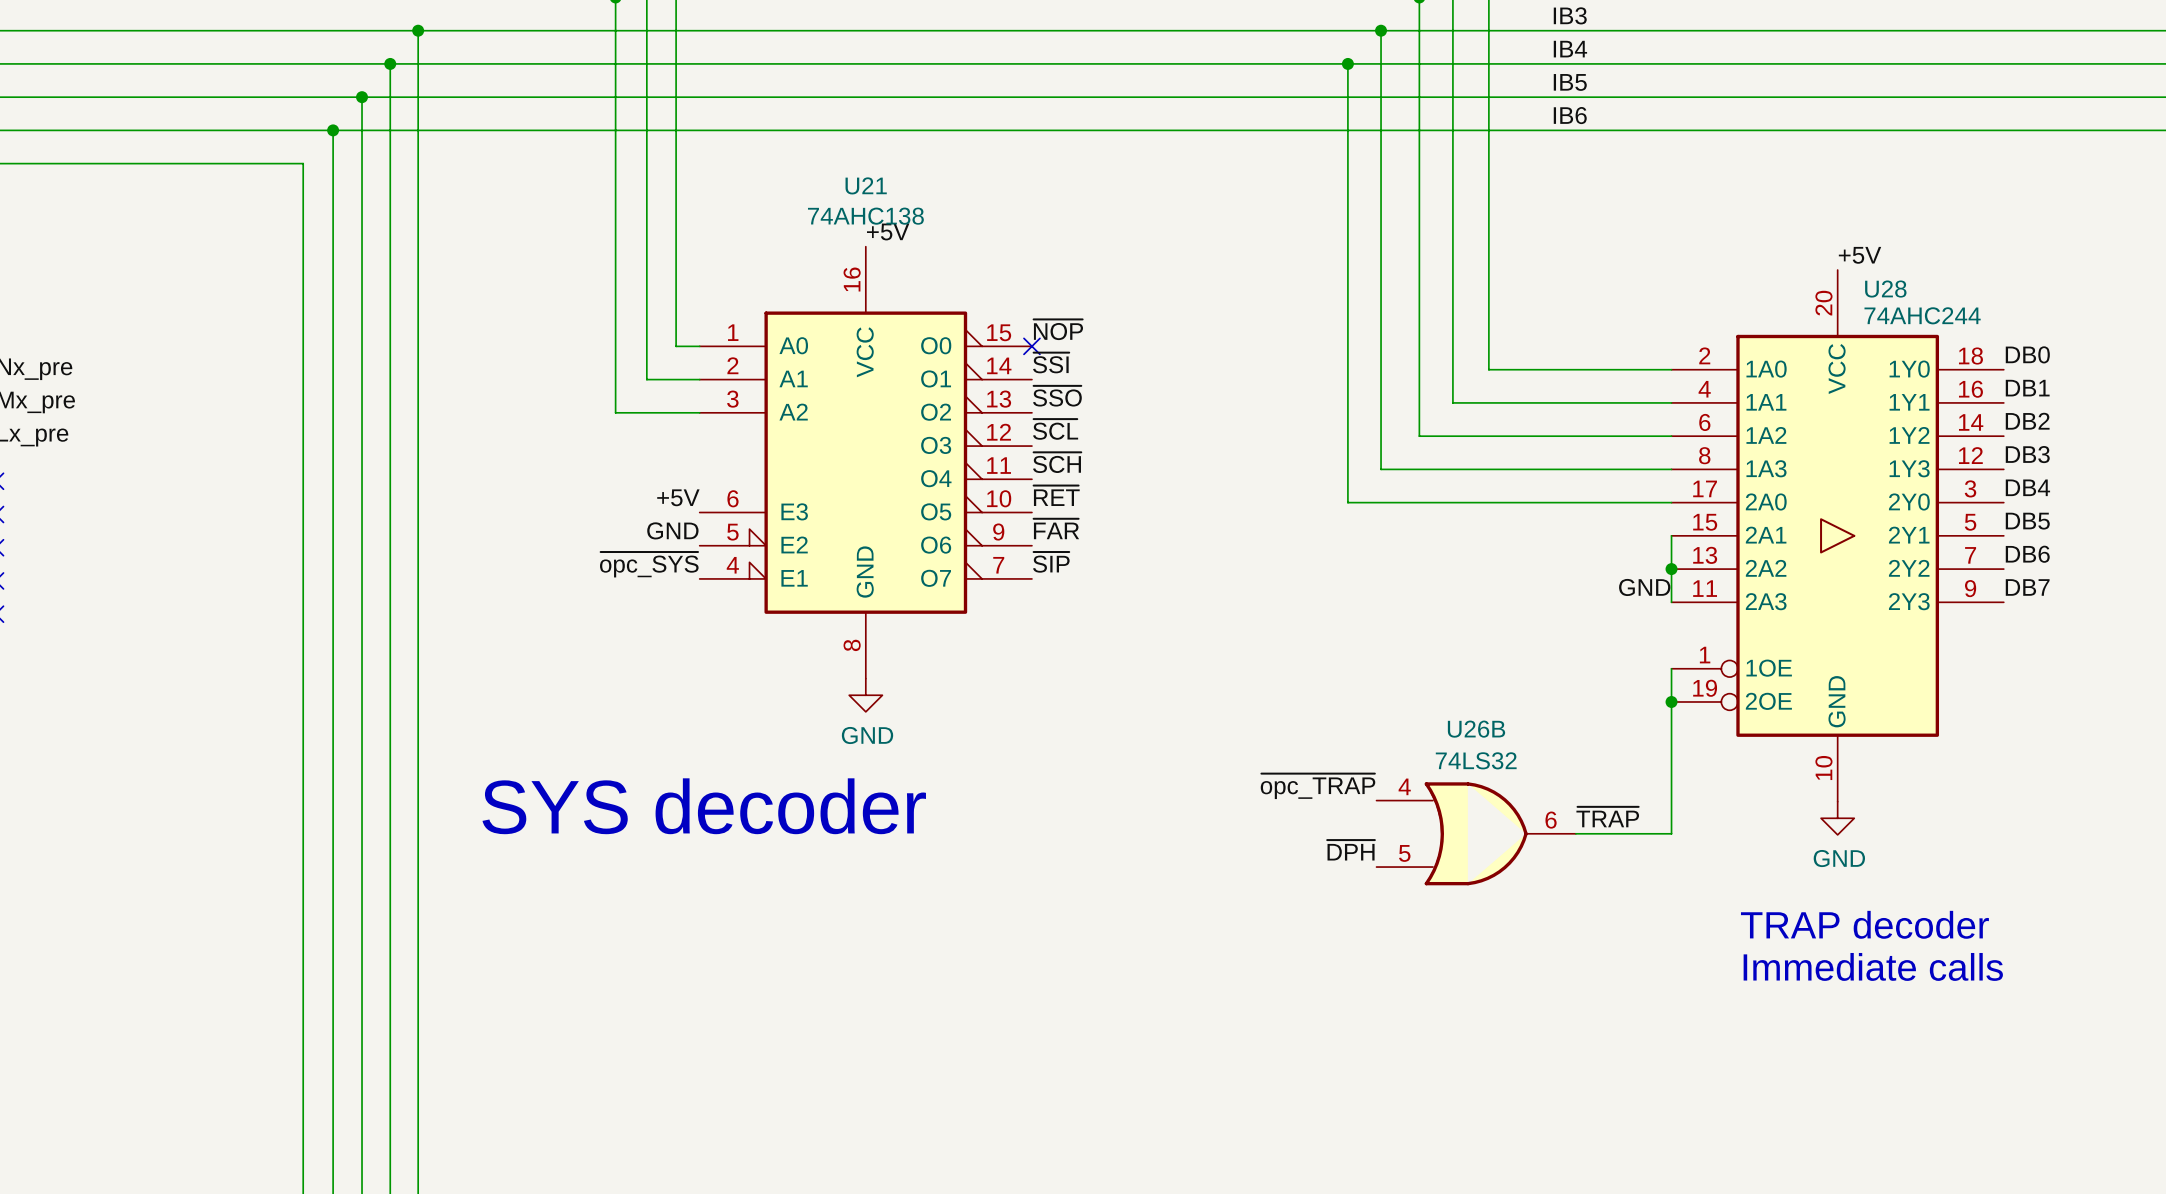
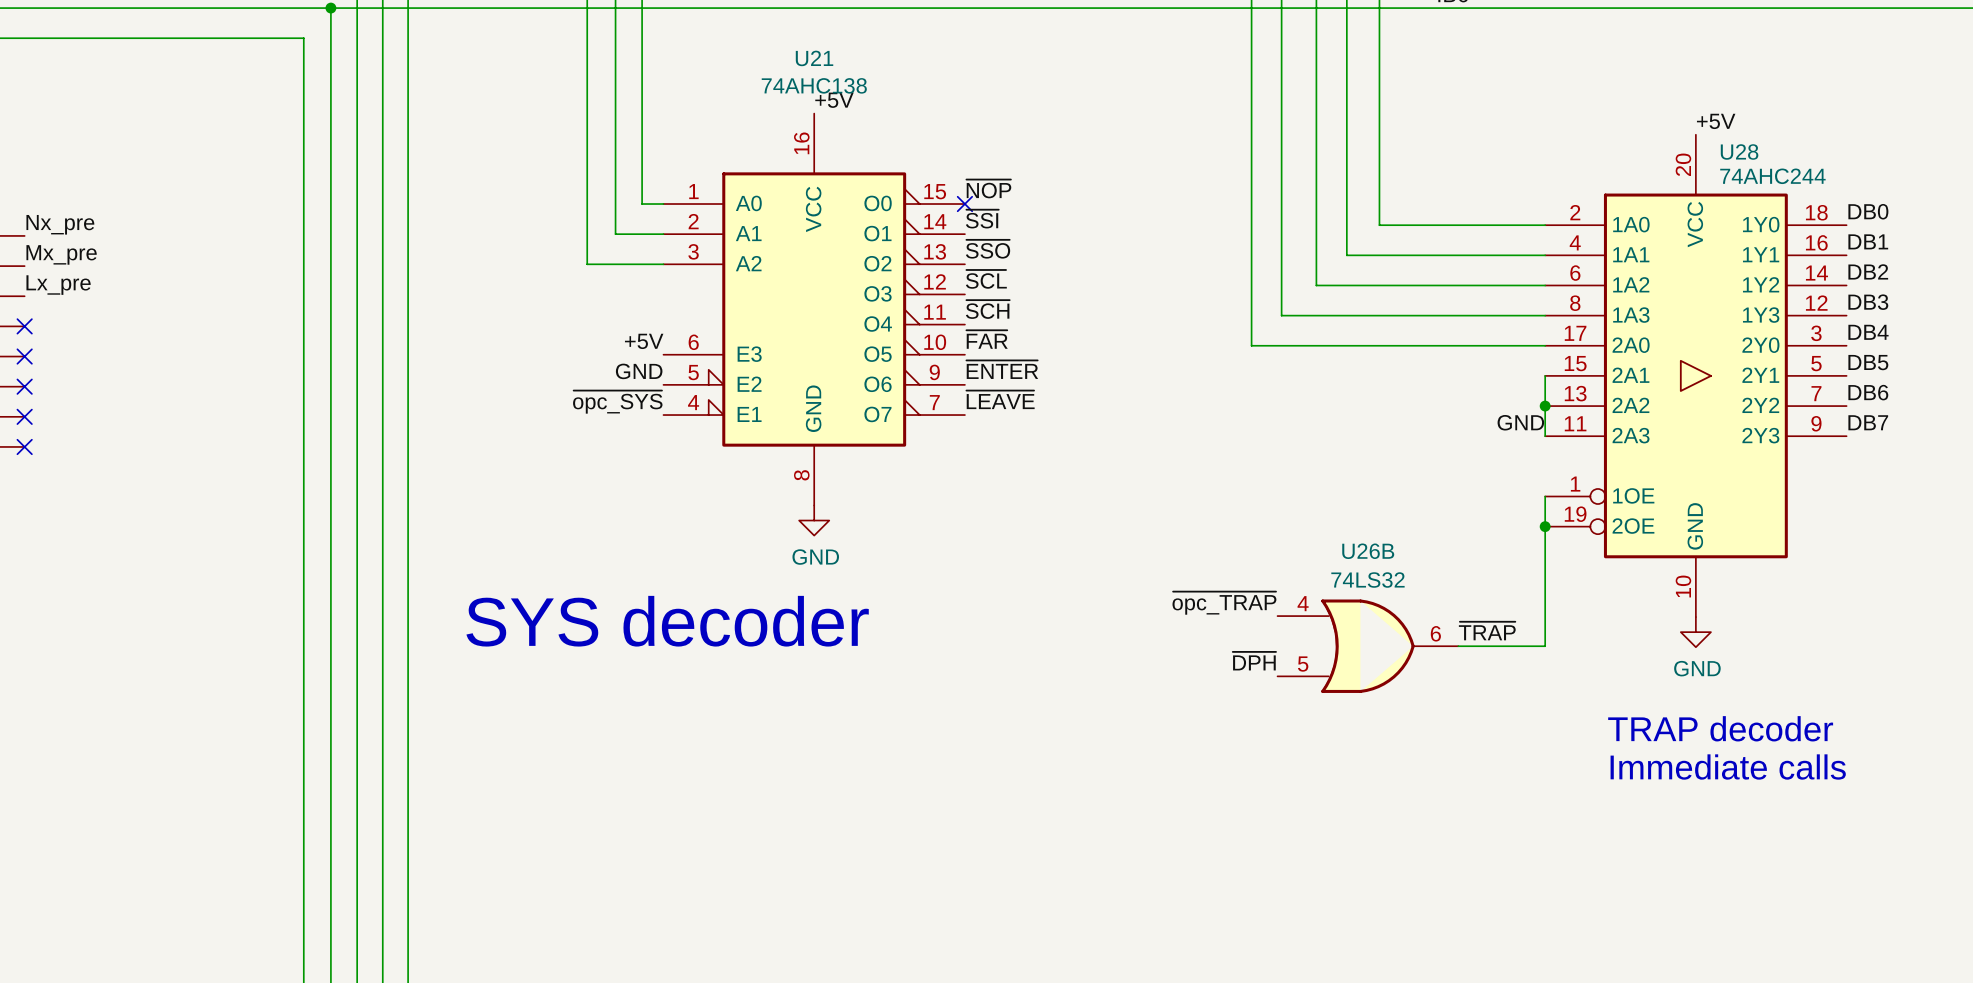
label: ~{RET} (1056, 495) -> ~{FAR} (987, 339)
label: ~{FAR} (1056, 528) -> ~{ENTER} (1002, 369)
label: ~{SIP} (1051, 562) -> ~{LEAVE} (1000, 399)

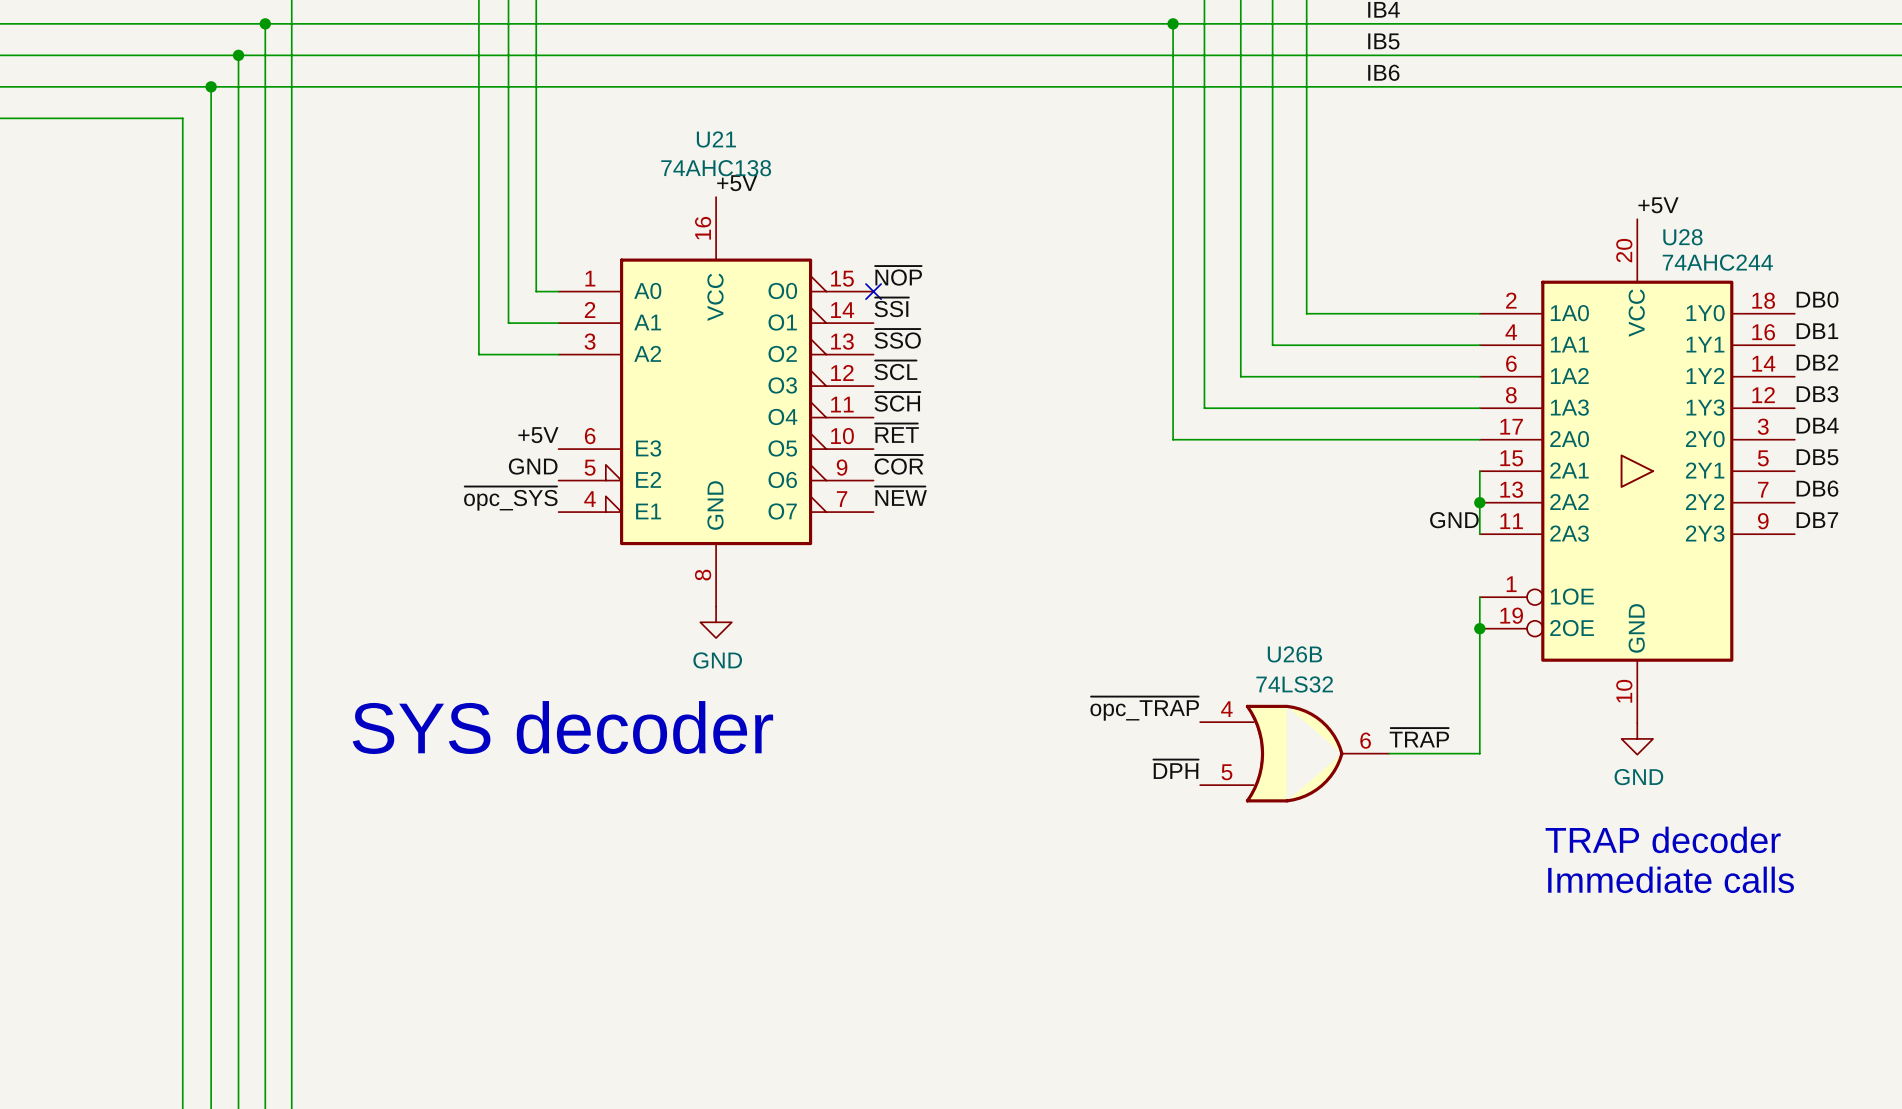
label: ~{FAR} (987, 339) -> ~{RET} (896, 433)
label: ~{ENTER} (1002, 369) -> ~{COR} (899, 464)
label: ~{LEAVE} (1000, 399) -> ~{NEW} (901, 496)

